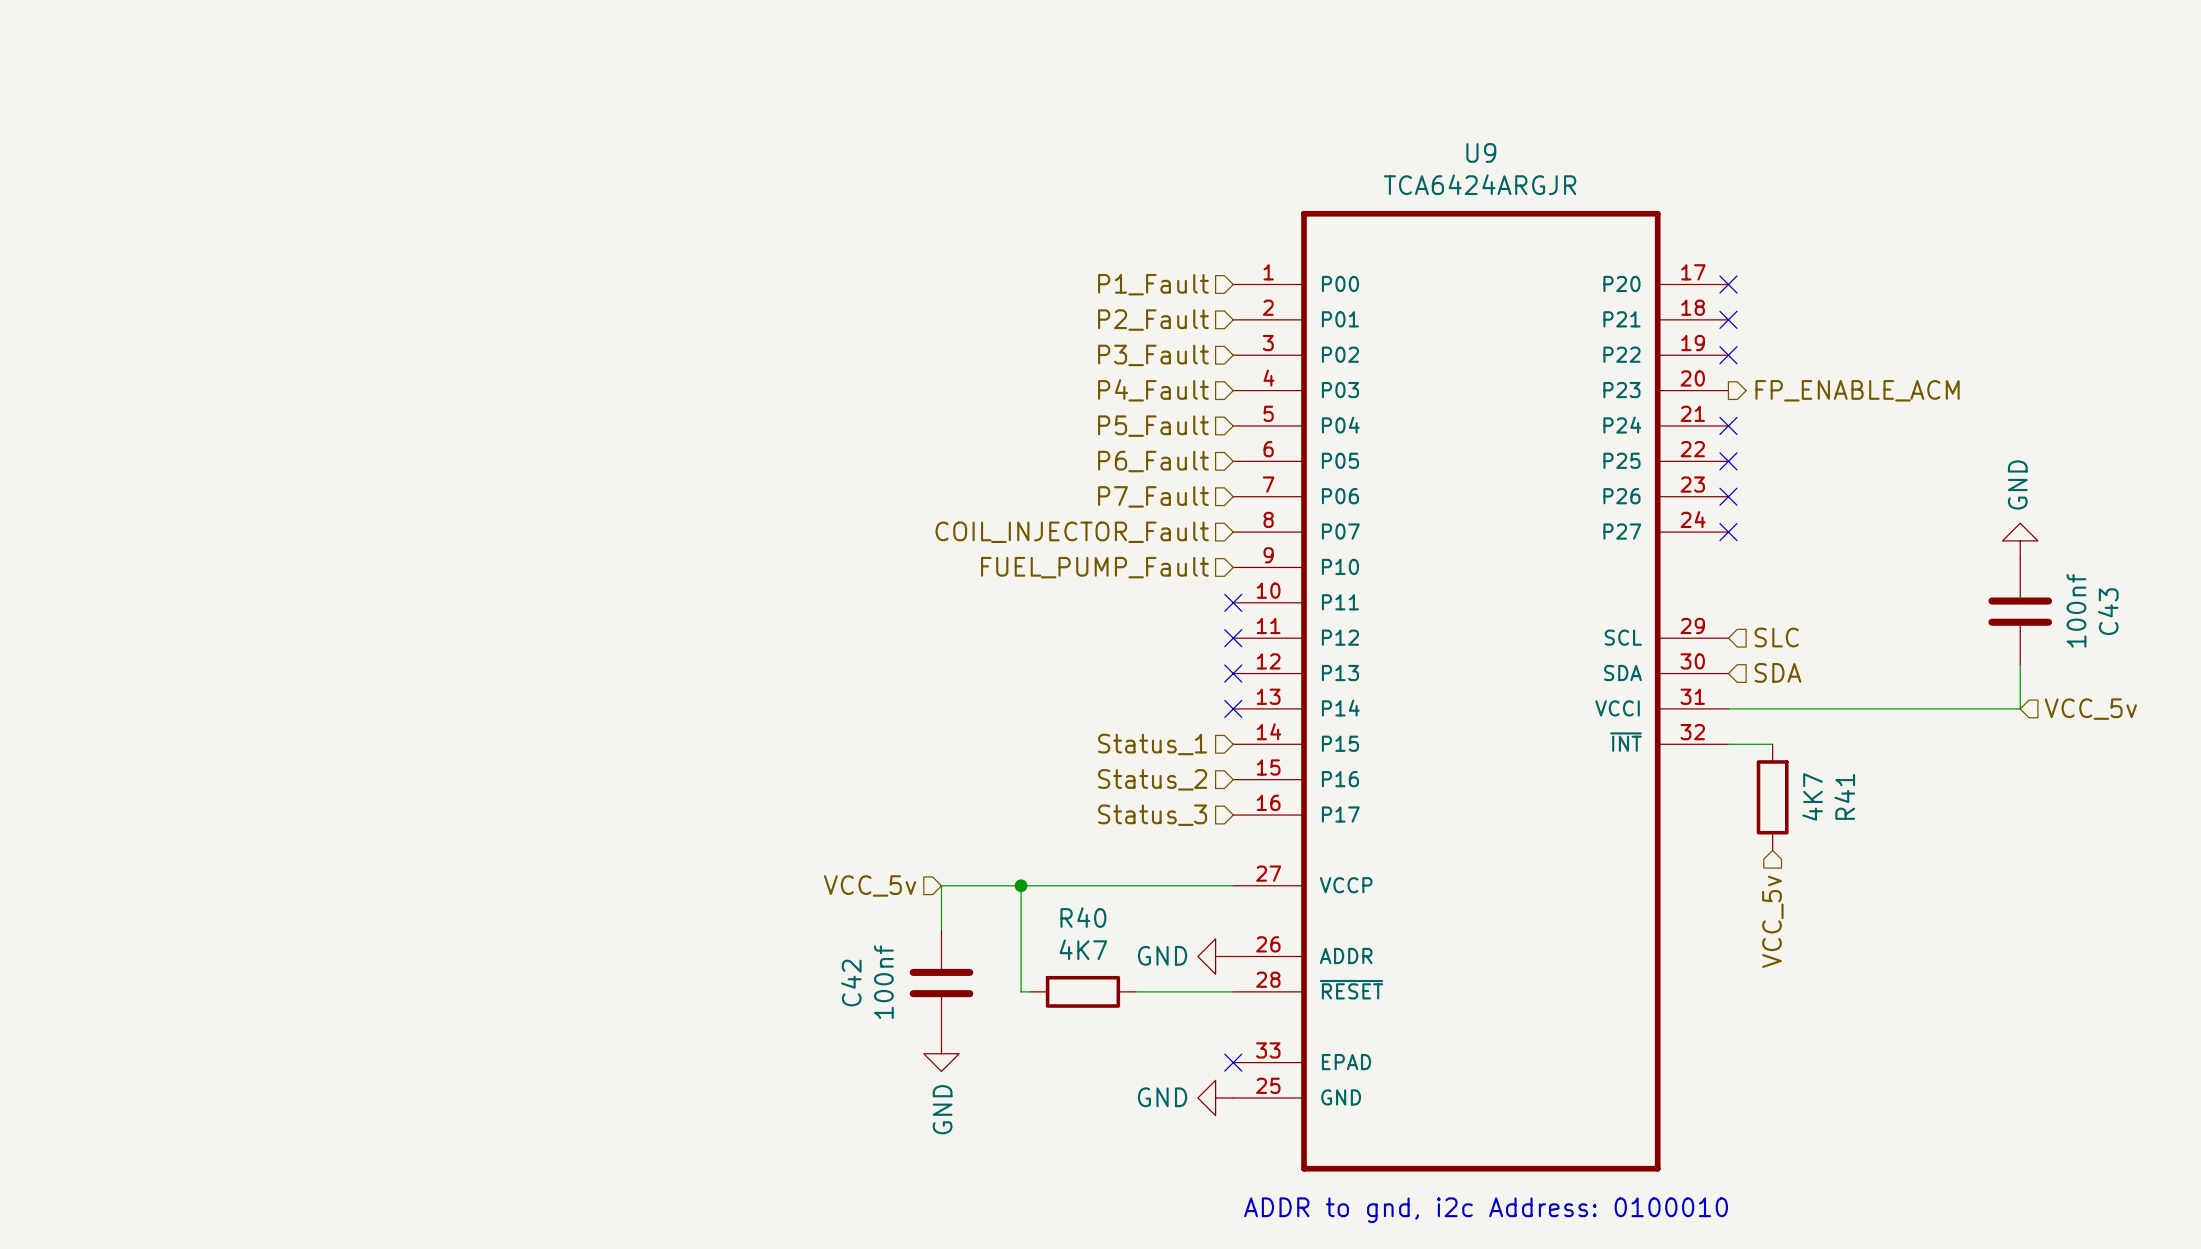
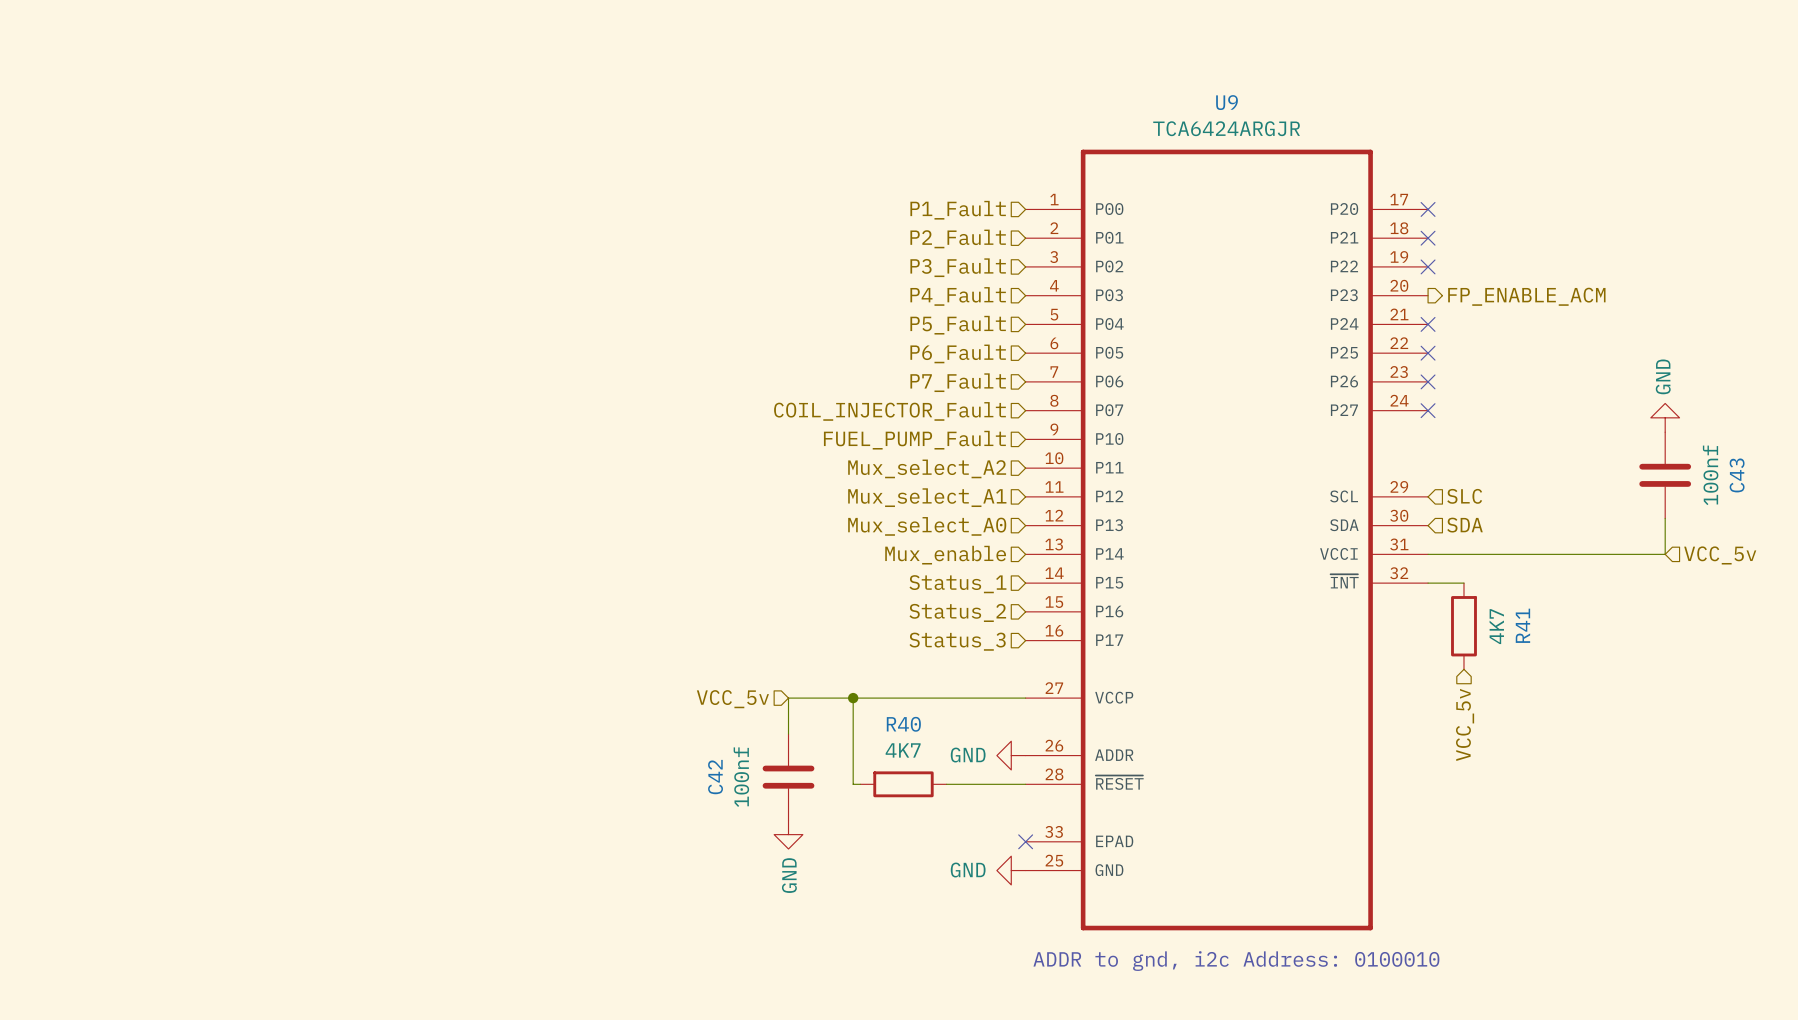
no-connect mark: (1233, 602) -> none
hierarchical label: none -> Mux_select_A2 (927, 468)
hierarchical label: none -> Mux_select_A1 (927, 497)
no-connect mark: (1233, 638) -> none
hierarchical label: none -> Mux_select_A0 (927, 526)
no-connect mark: (1233, 673) -> none
no-connect mark: (1233, 708) -> none
hierarchical label: none -> Mux_enable (945, 555)

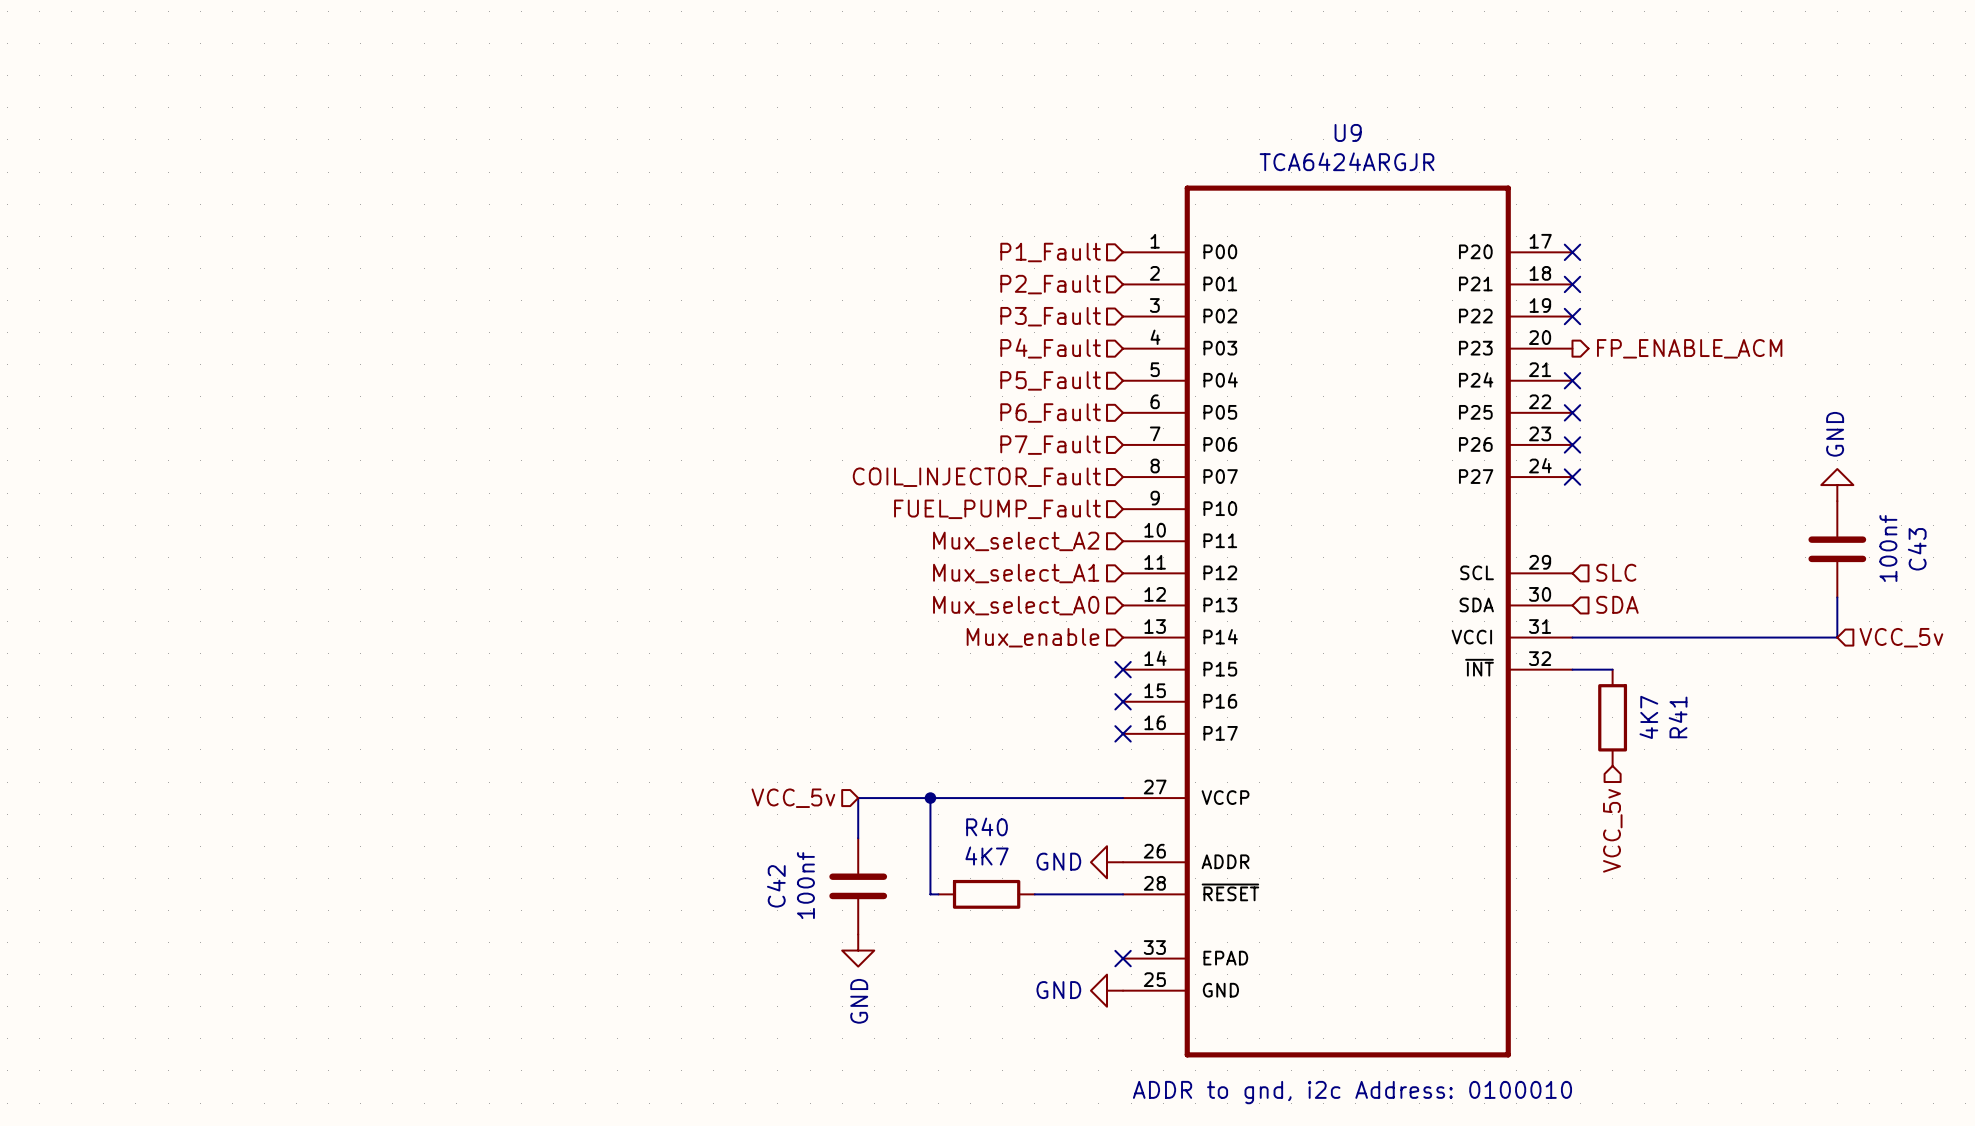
no-connect mark: none -> (1123, 669)
hierarchical label: Status_1 (957, 584) -> none
no-connect mark: none -> (1123, 701)
hierarchical label: Status_2 (957, 612) -> none
no-connect mark: none -> (1123, 733)
hierarchical label: Status_3 (957, 641) -> none

